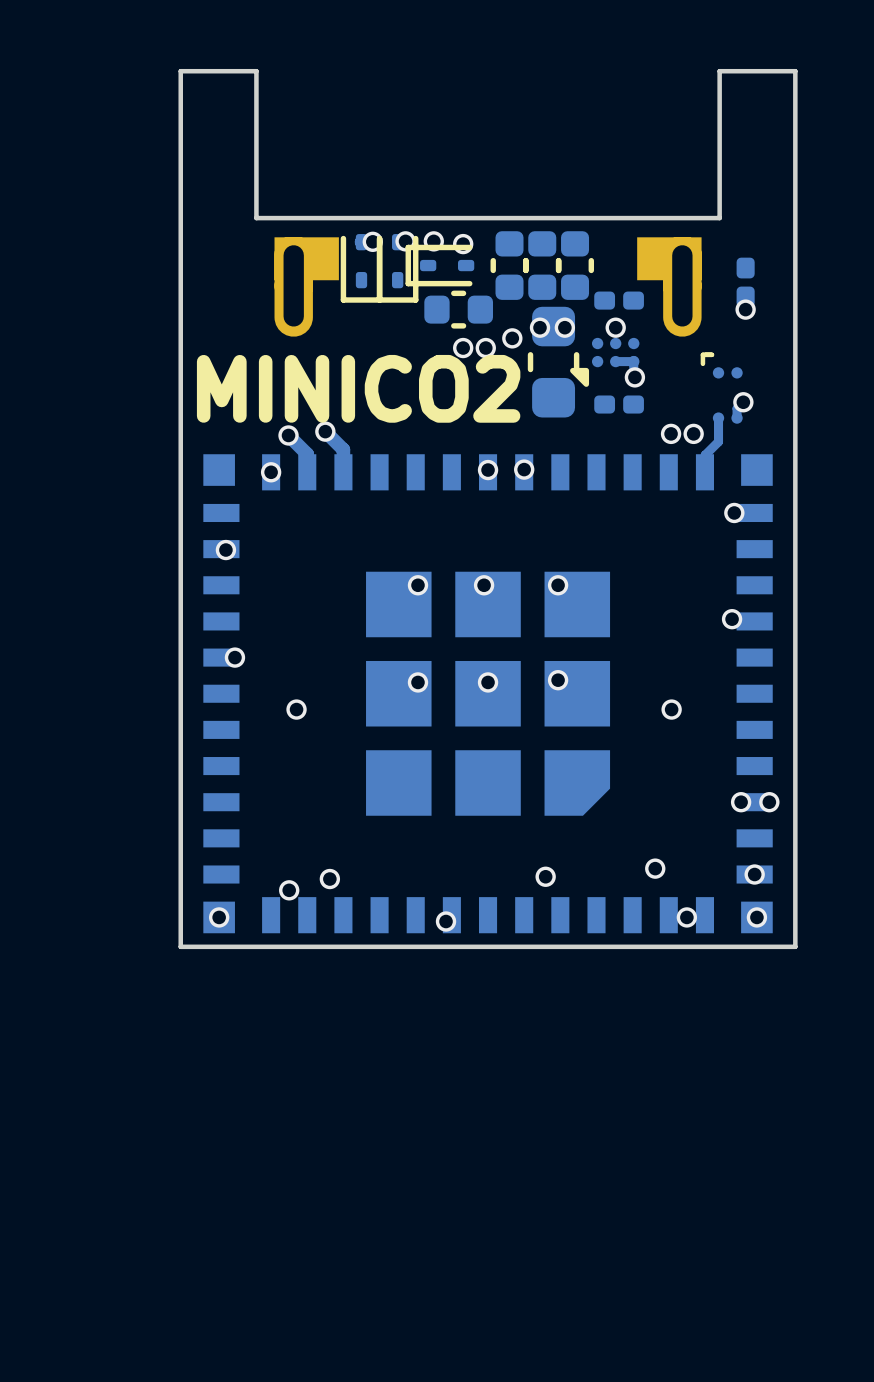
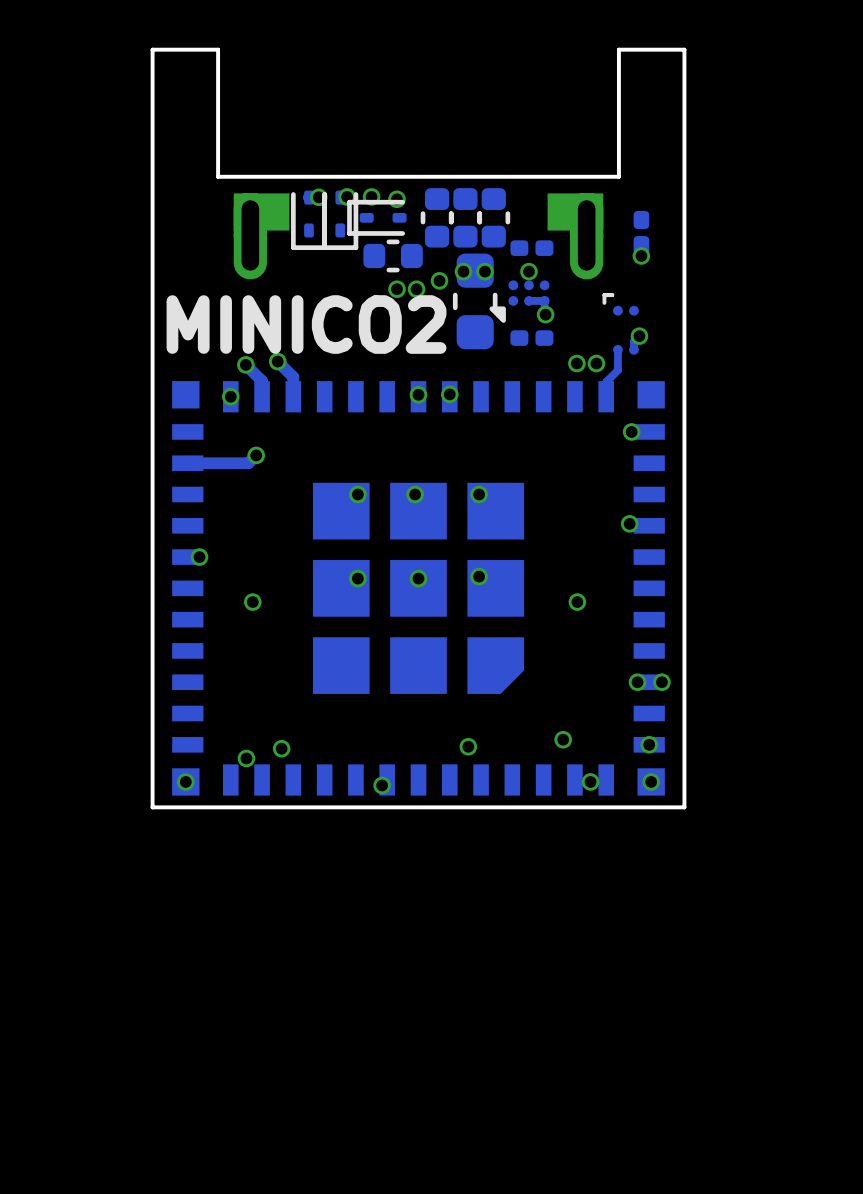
track: none -> (256, 455) (248, 463) (187, 463)
via position: (225, 550) -> (256, 455)

